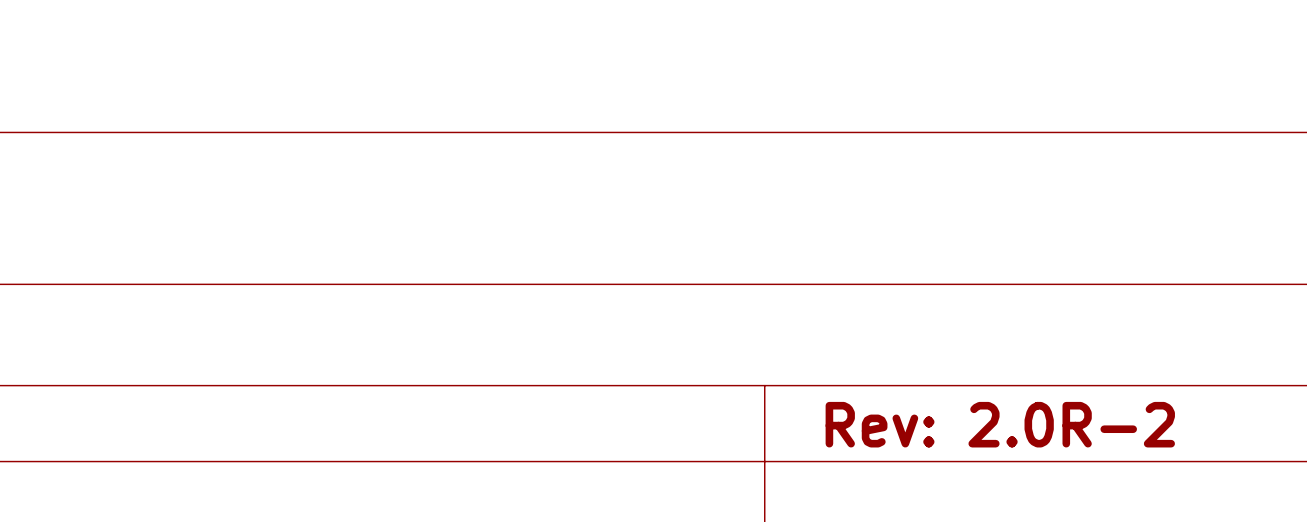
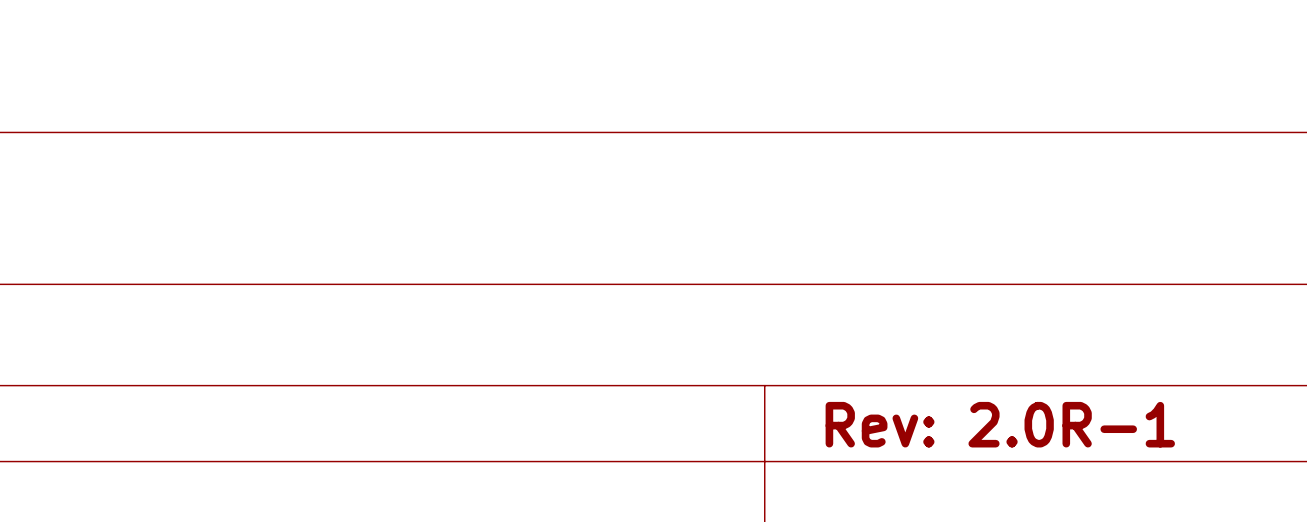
title block: Rev: 2.0R-2 (1000, 424) -> Rev: 2.0R-1 (1000, 424)

